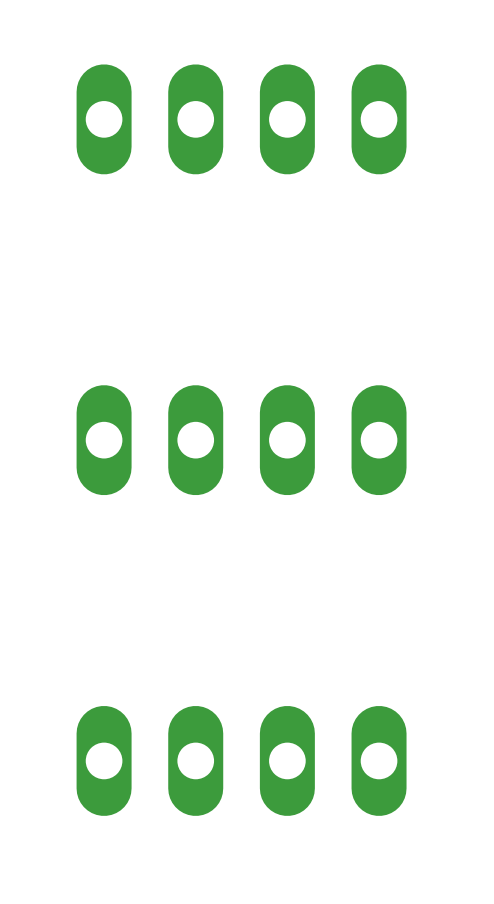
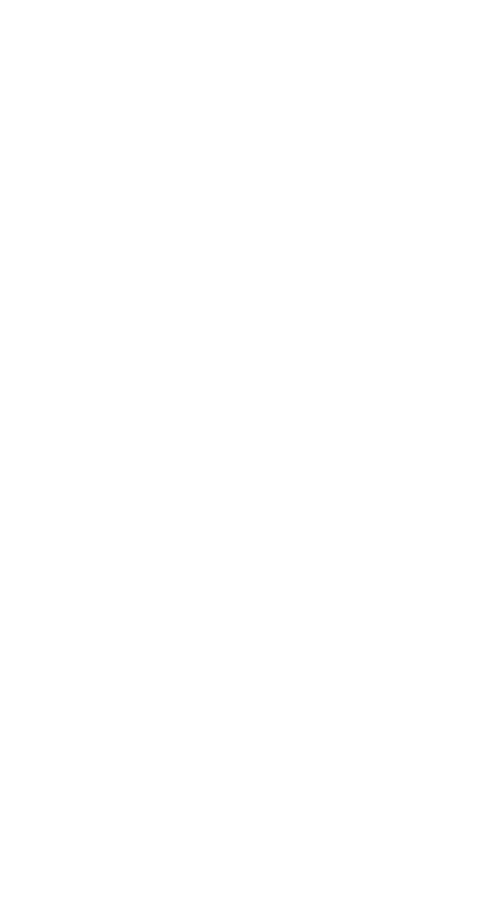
part: (241, 119) -> none
part: (241, 440) -> none
part: (241, 760) -> none

